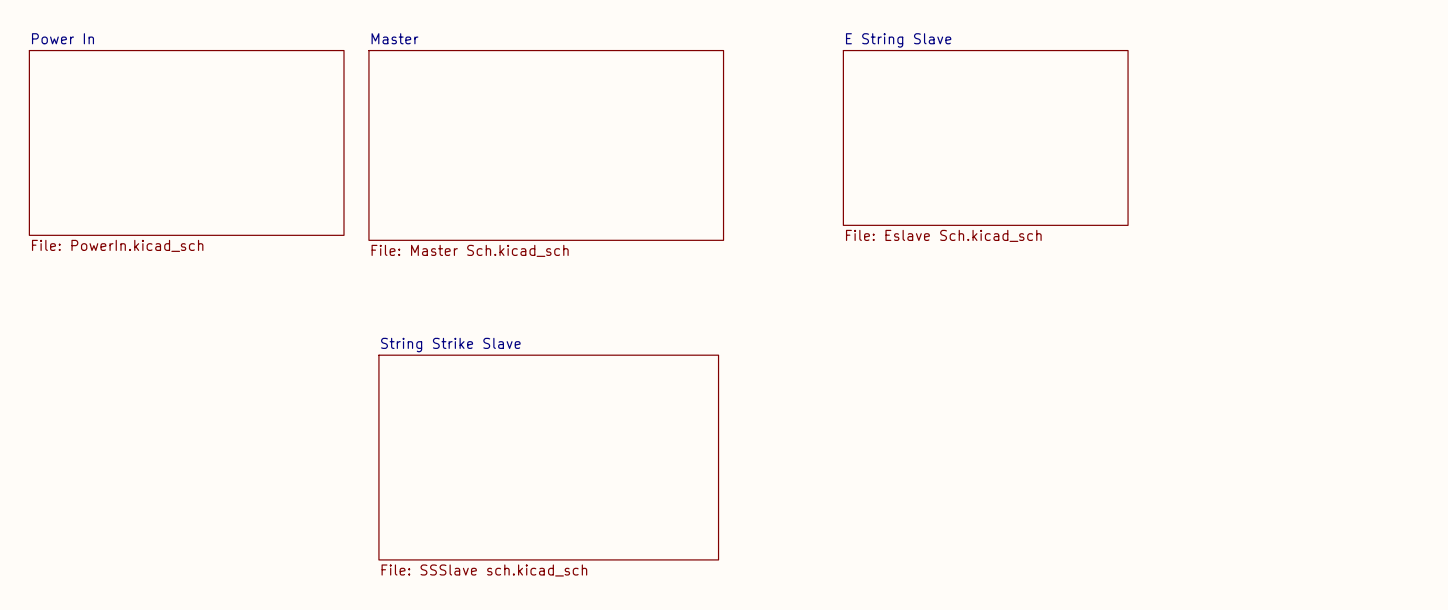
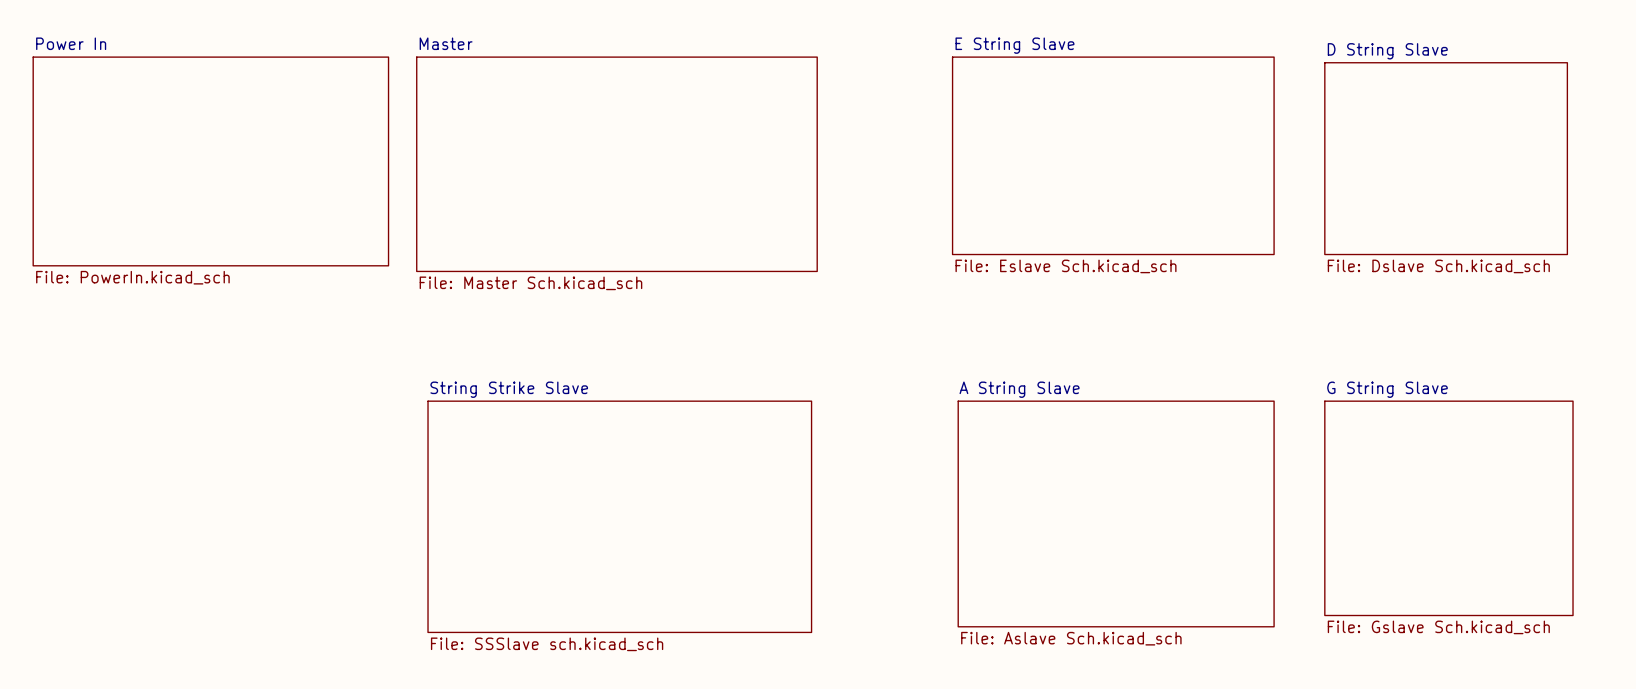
sheet D String Slave: none -> File: Dslave Sch.kicad_sch (1446, 158)
sheet G String Slave: none -> File: Gslave Sch.kicad_sch (1448, 508)
sheet A String Slave: none -> File: Aslave Sch.kicad_sch (1116, 513)

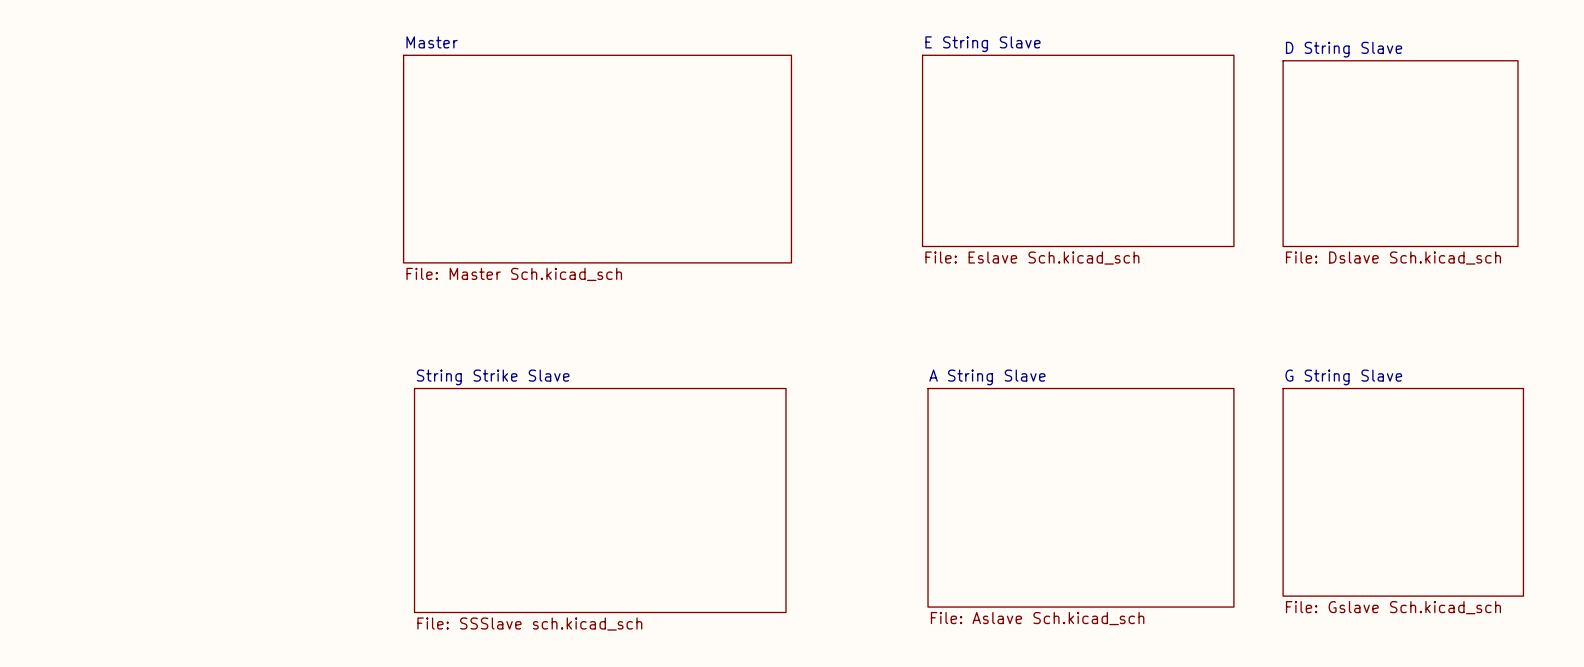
sheet Power In: File: PowerIn.kicad_sch (210, 161) -> none

